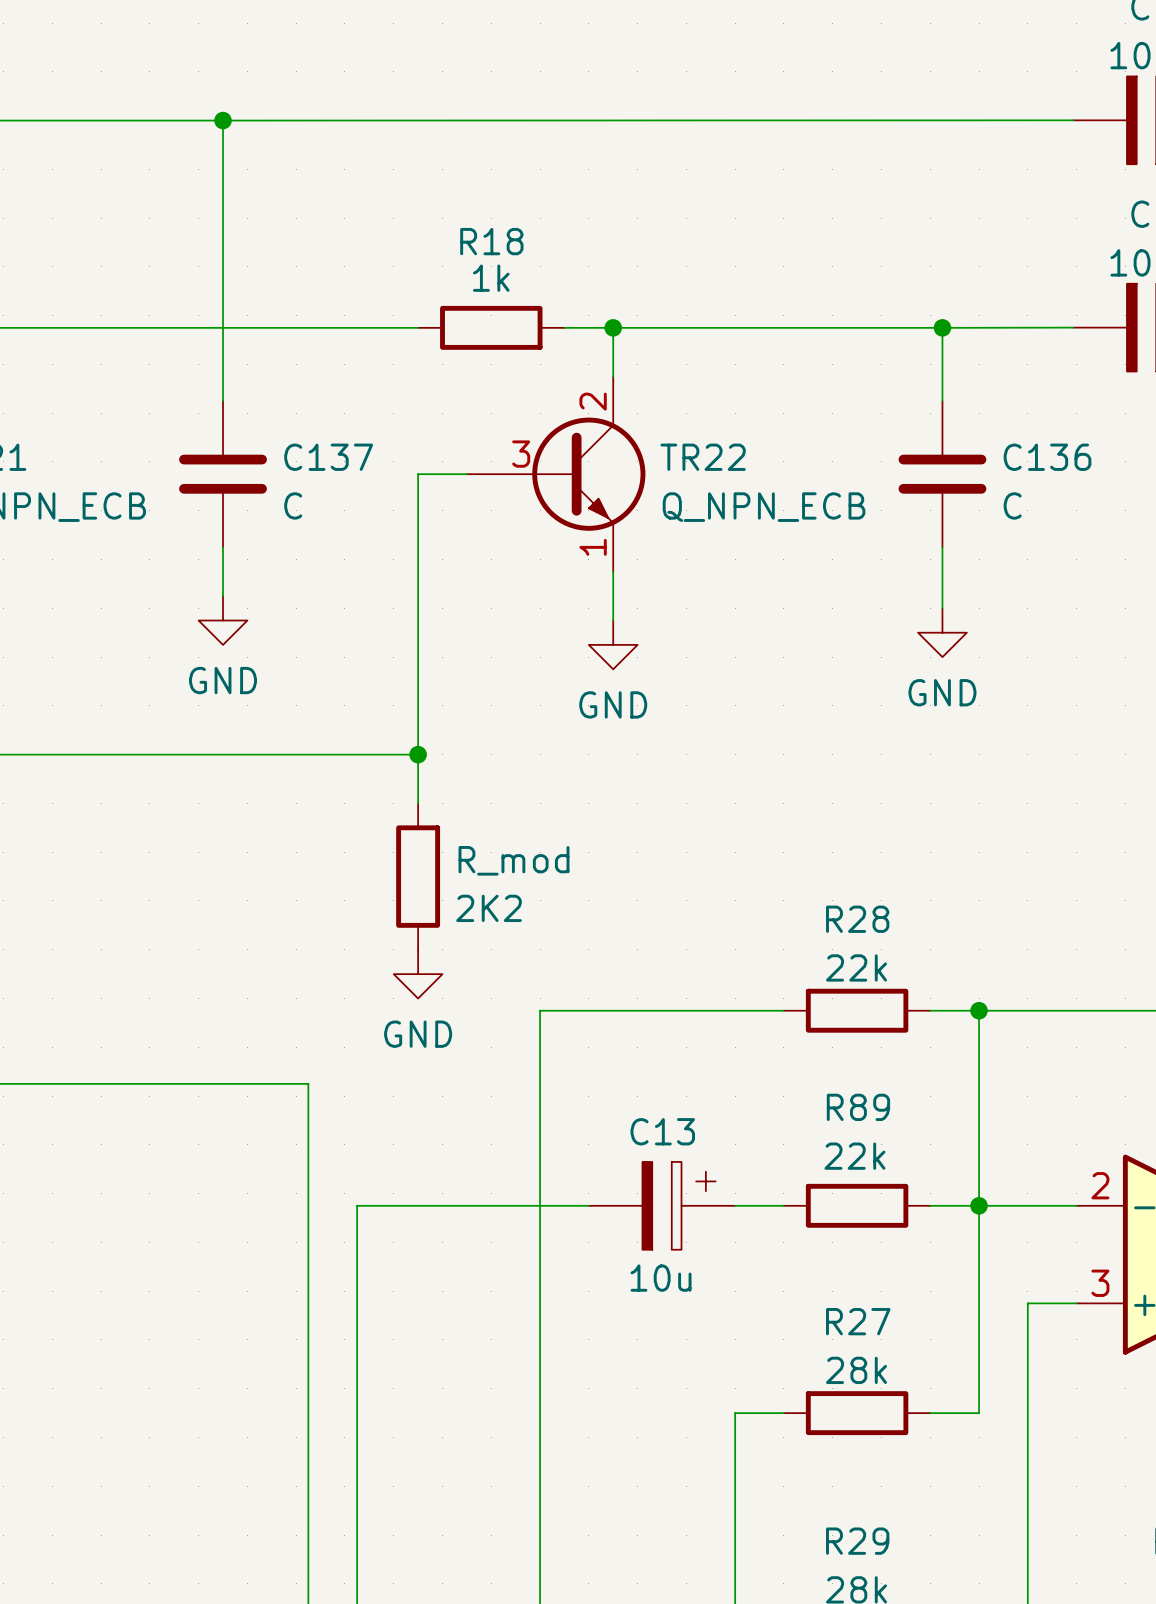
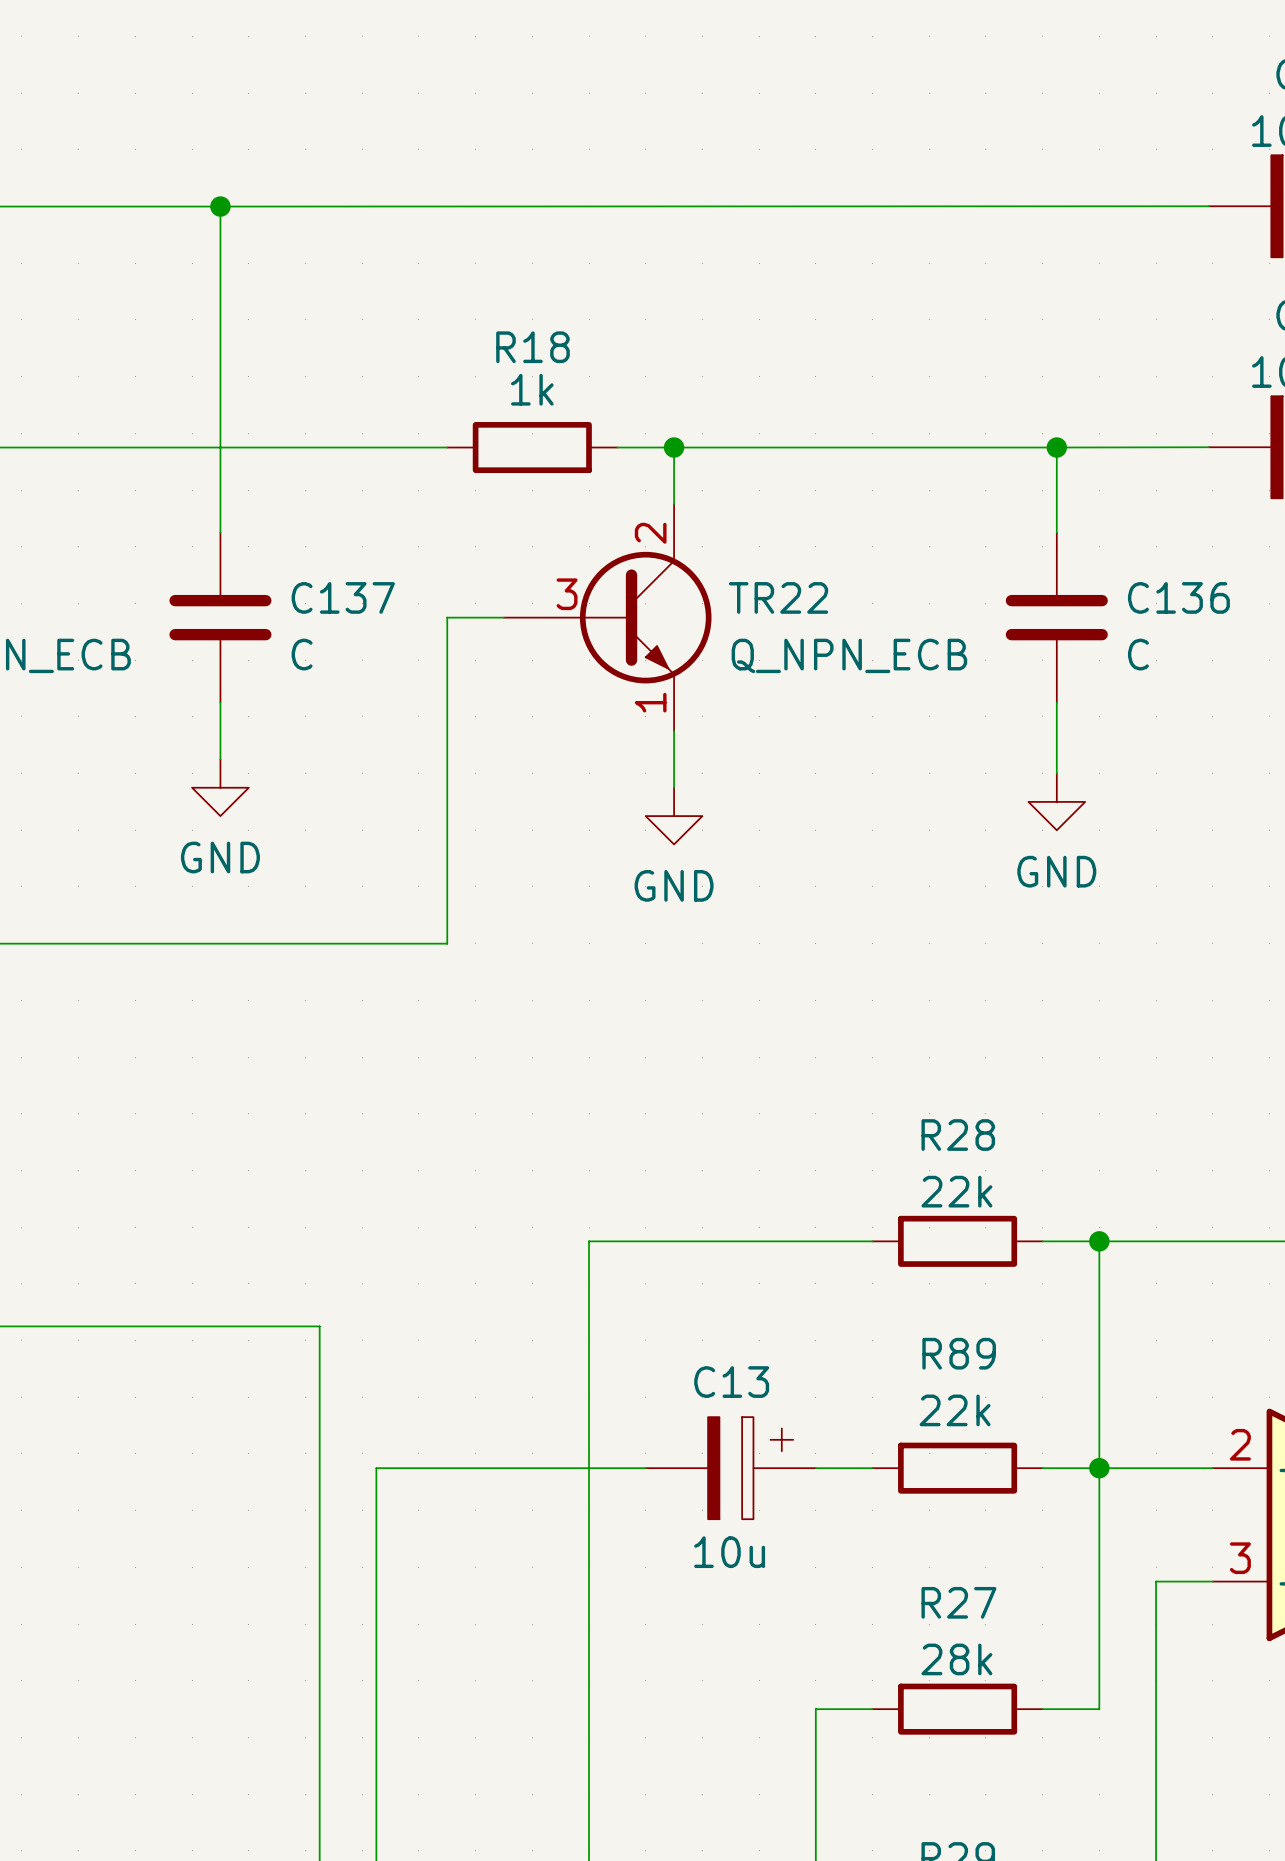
wire: (418, 754) (418, 803) -> none
junction: (418, 754) -> none
R_mod: 2K2 (418, 876) -> none
power symbol: GND (418, 974) -> none

